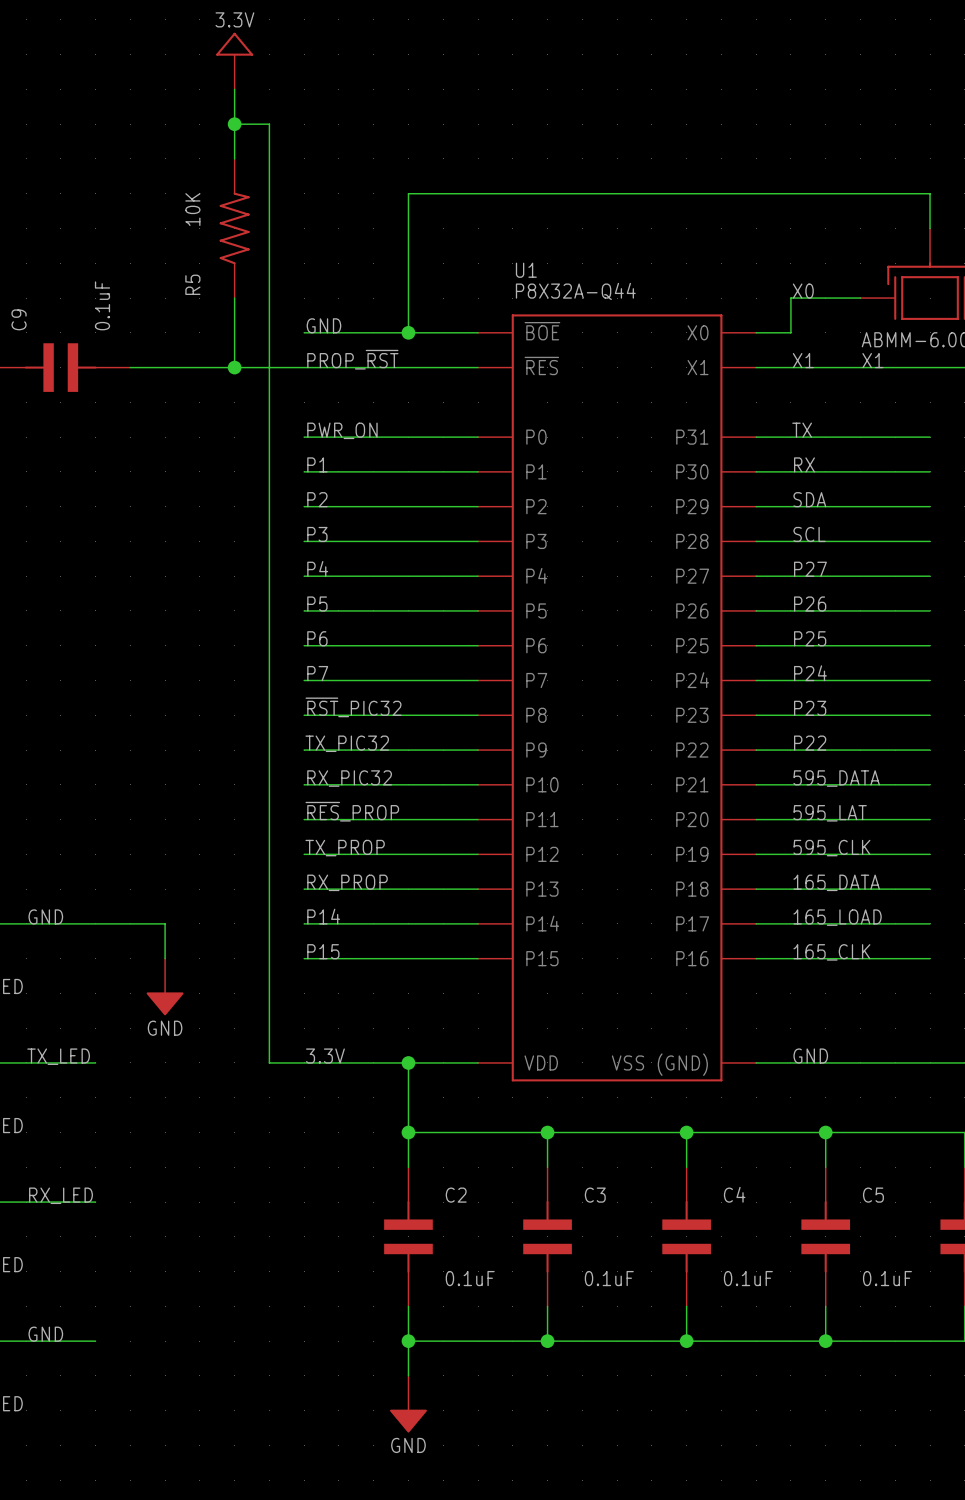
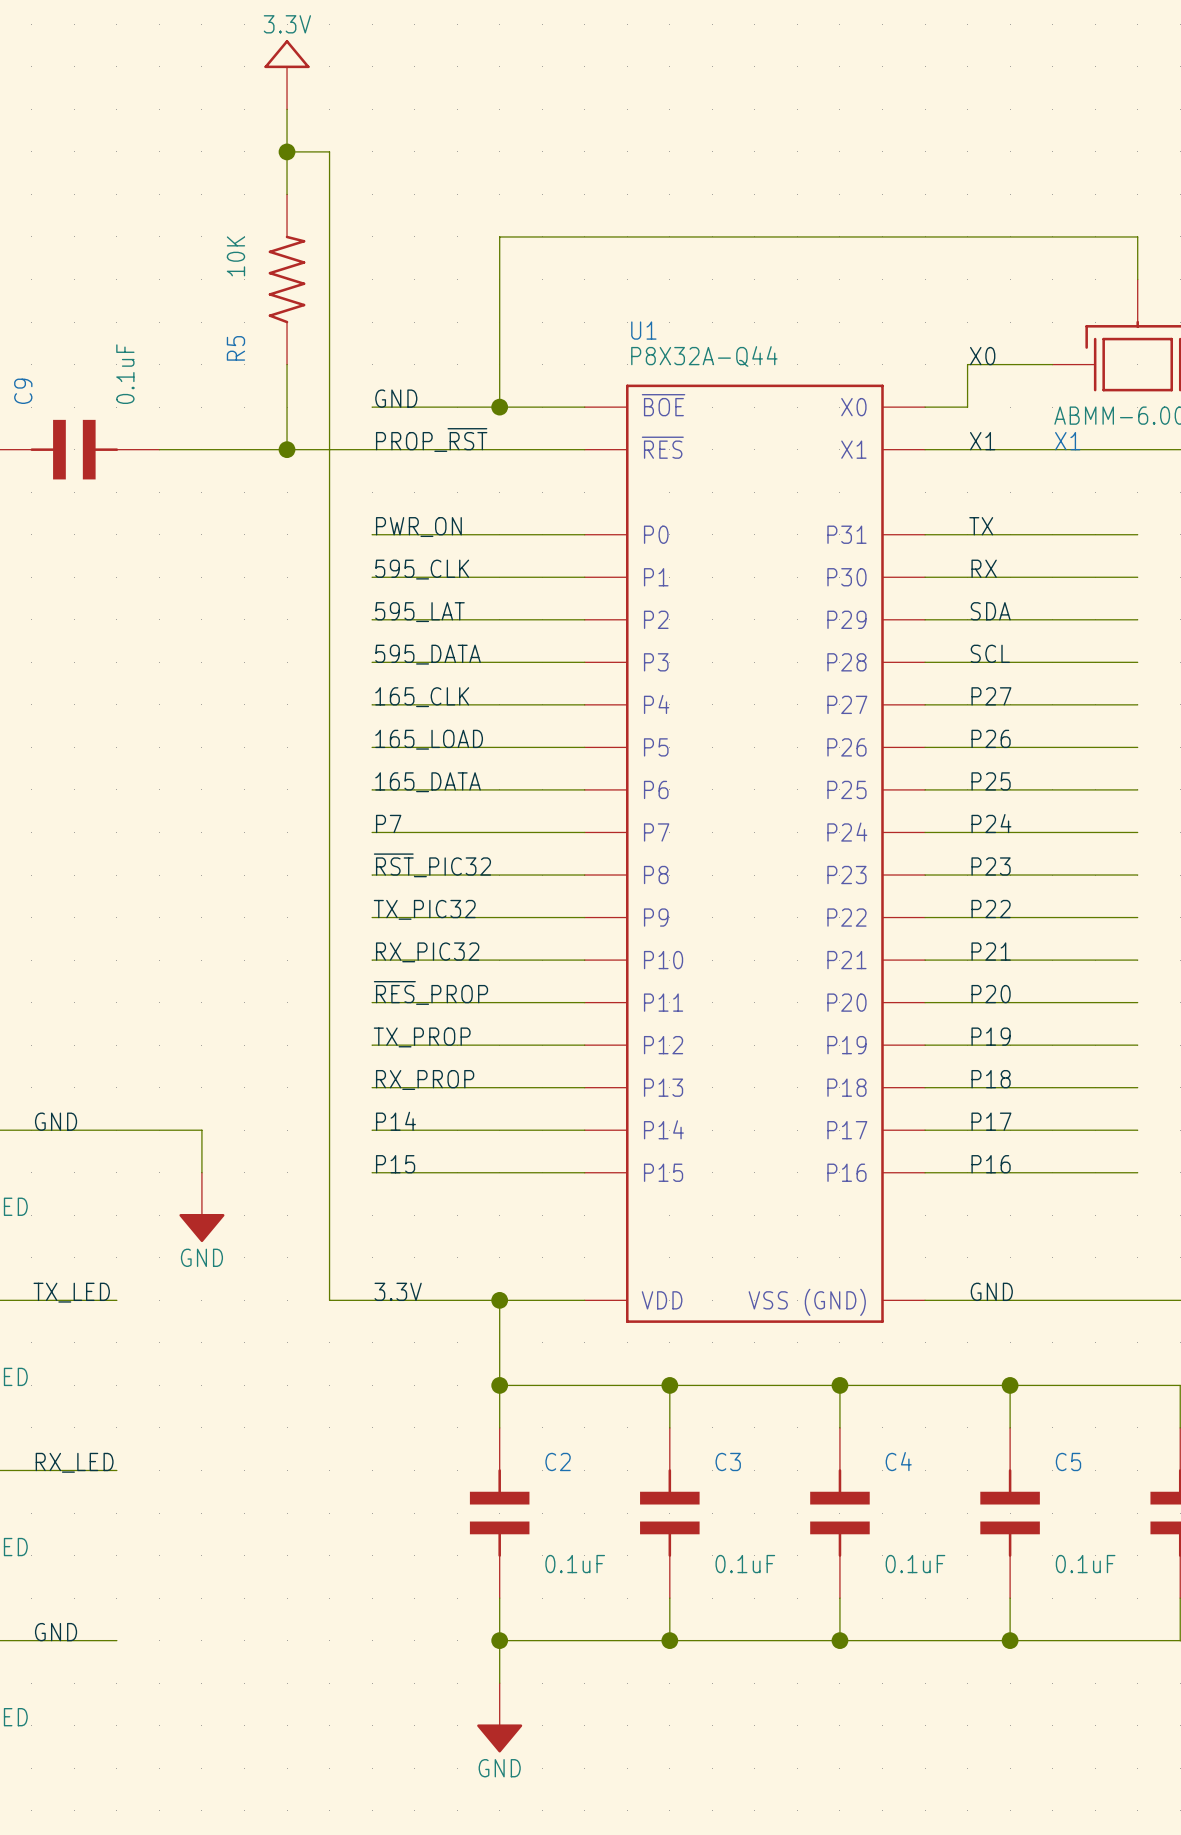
label: P1 (317, 464) -> 595_CLK (422, 569)
label: P2 (317, 499) -> 595_LAT (420, 612)
label: P3 (317, 534) -> 595_DATA (428, 654)
label: P4 (317, 568) -> 165_CLK (422, 697)
label: P5 (317, 604) -> 165_LOAD (429, 739)
label: P6 (317, 638) -> 165_DATA (428, 782)
label: 595_DATA (836, 778) -> P21 (991, 951)
label: 595_LAT (830, 813) -> P20 (991, 994)
label: 595_CLK (831, 848) -> P19 (991, 1036)
label: 165_DATA (836, 882) -> P18 (991, 1079)
label: 165_LOAD (837, 917) -> P17 (991, 1121)
label: 165_CLK (831, 952) -> P16 (991, 1164)

